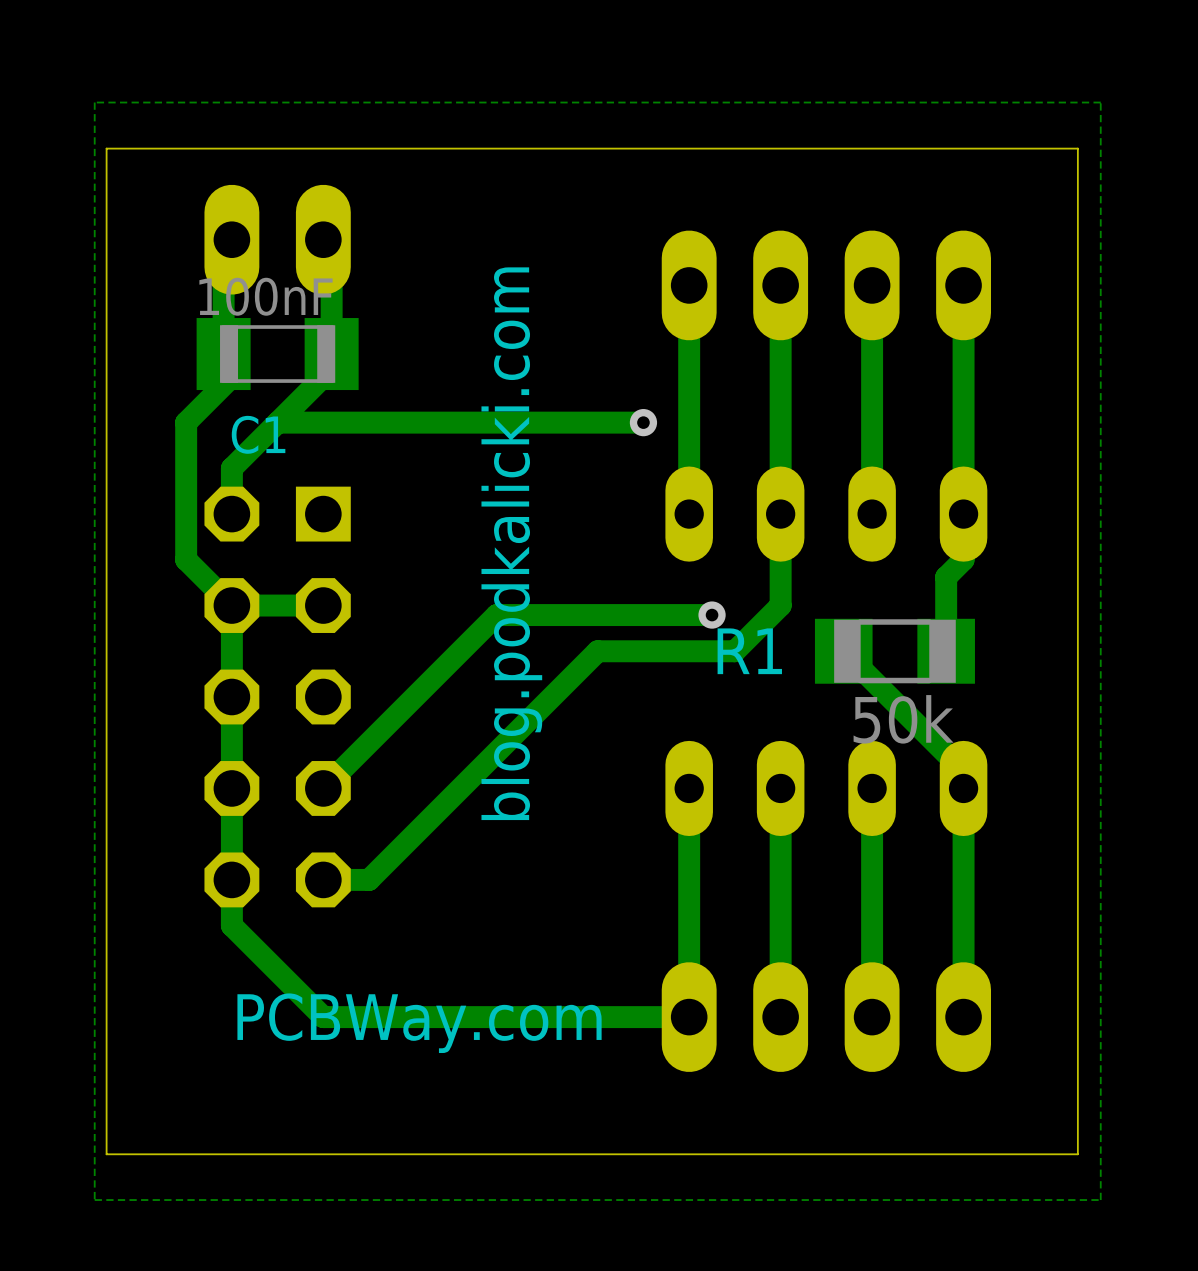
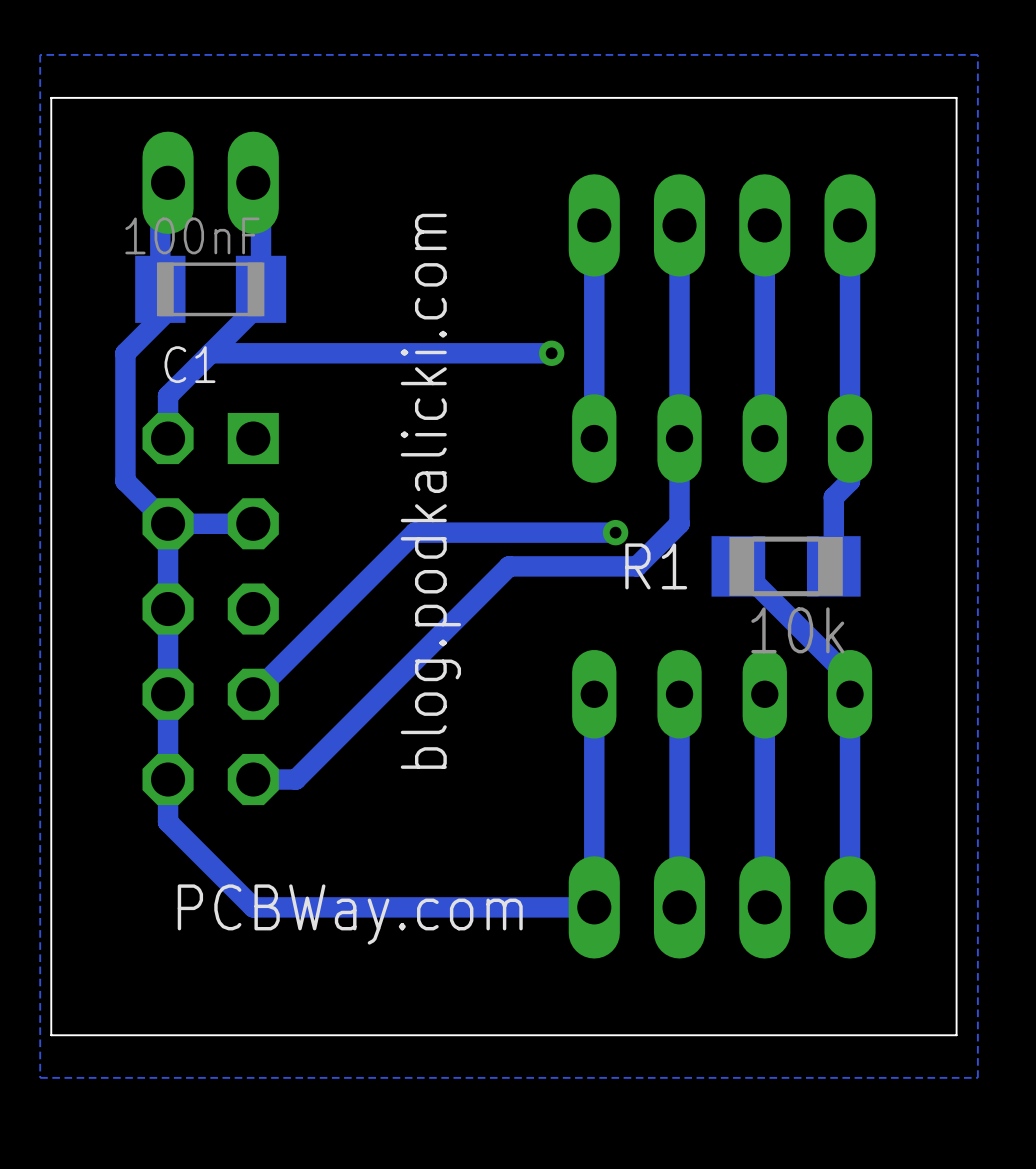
R1 value: 50k (903, 719) -> 10k (797, 630)

